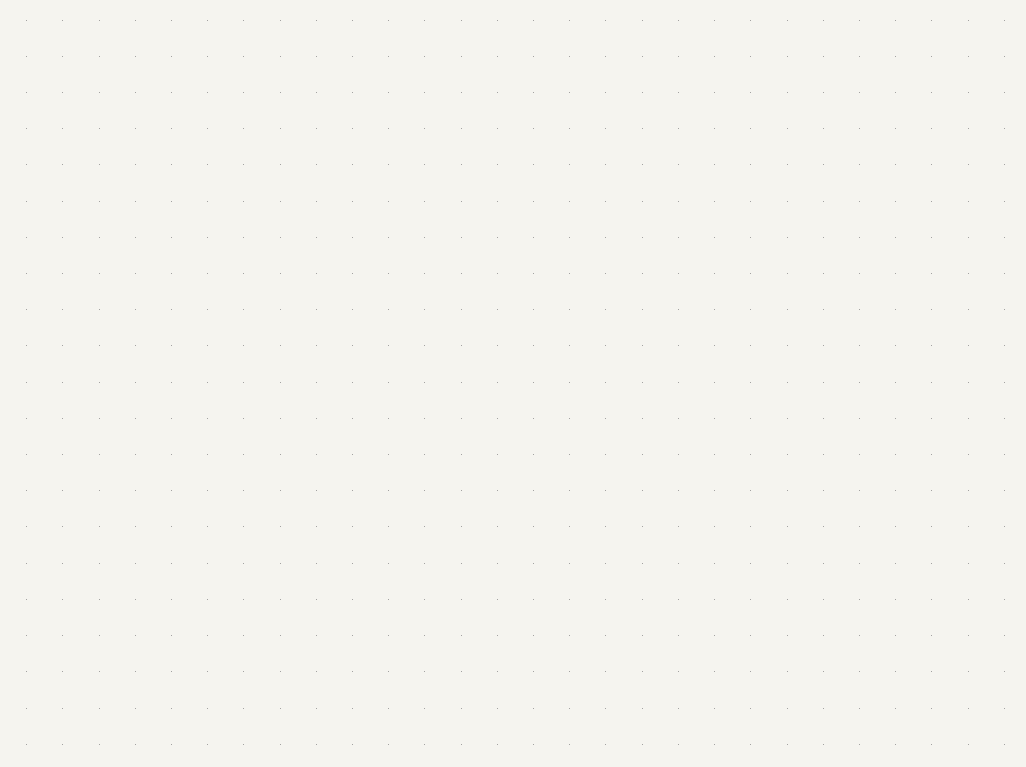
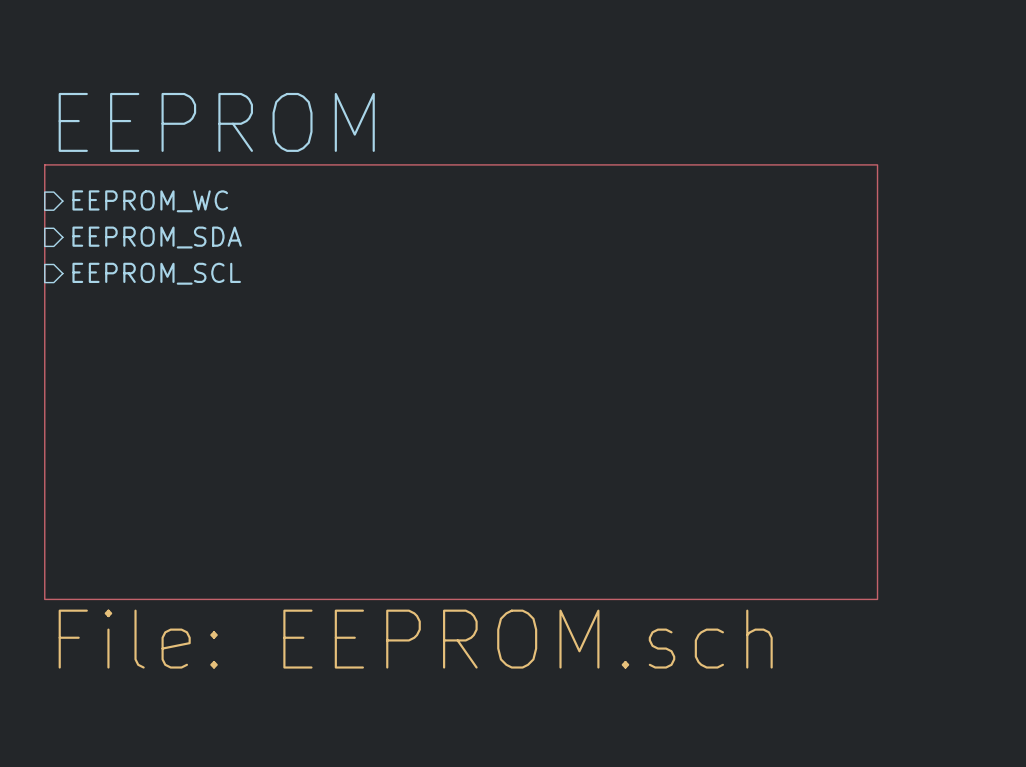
sheet pin: none -> EEPROM_WC (150, 201)
sheet pin: none -> EEPROM_SDA (157, 237)
sheet pin: none -> EEPROM_SCL (156, 273)
sheet EEPROM: none -> File: EEPROM.sch (461, 382)

